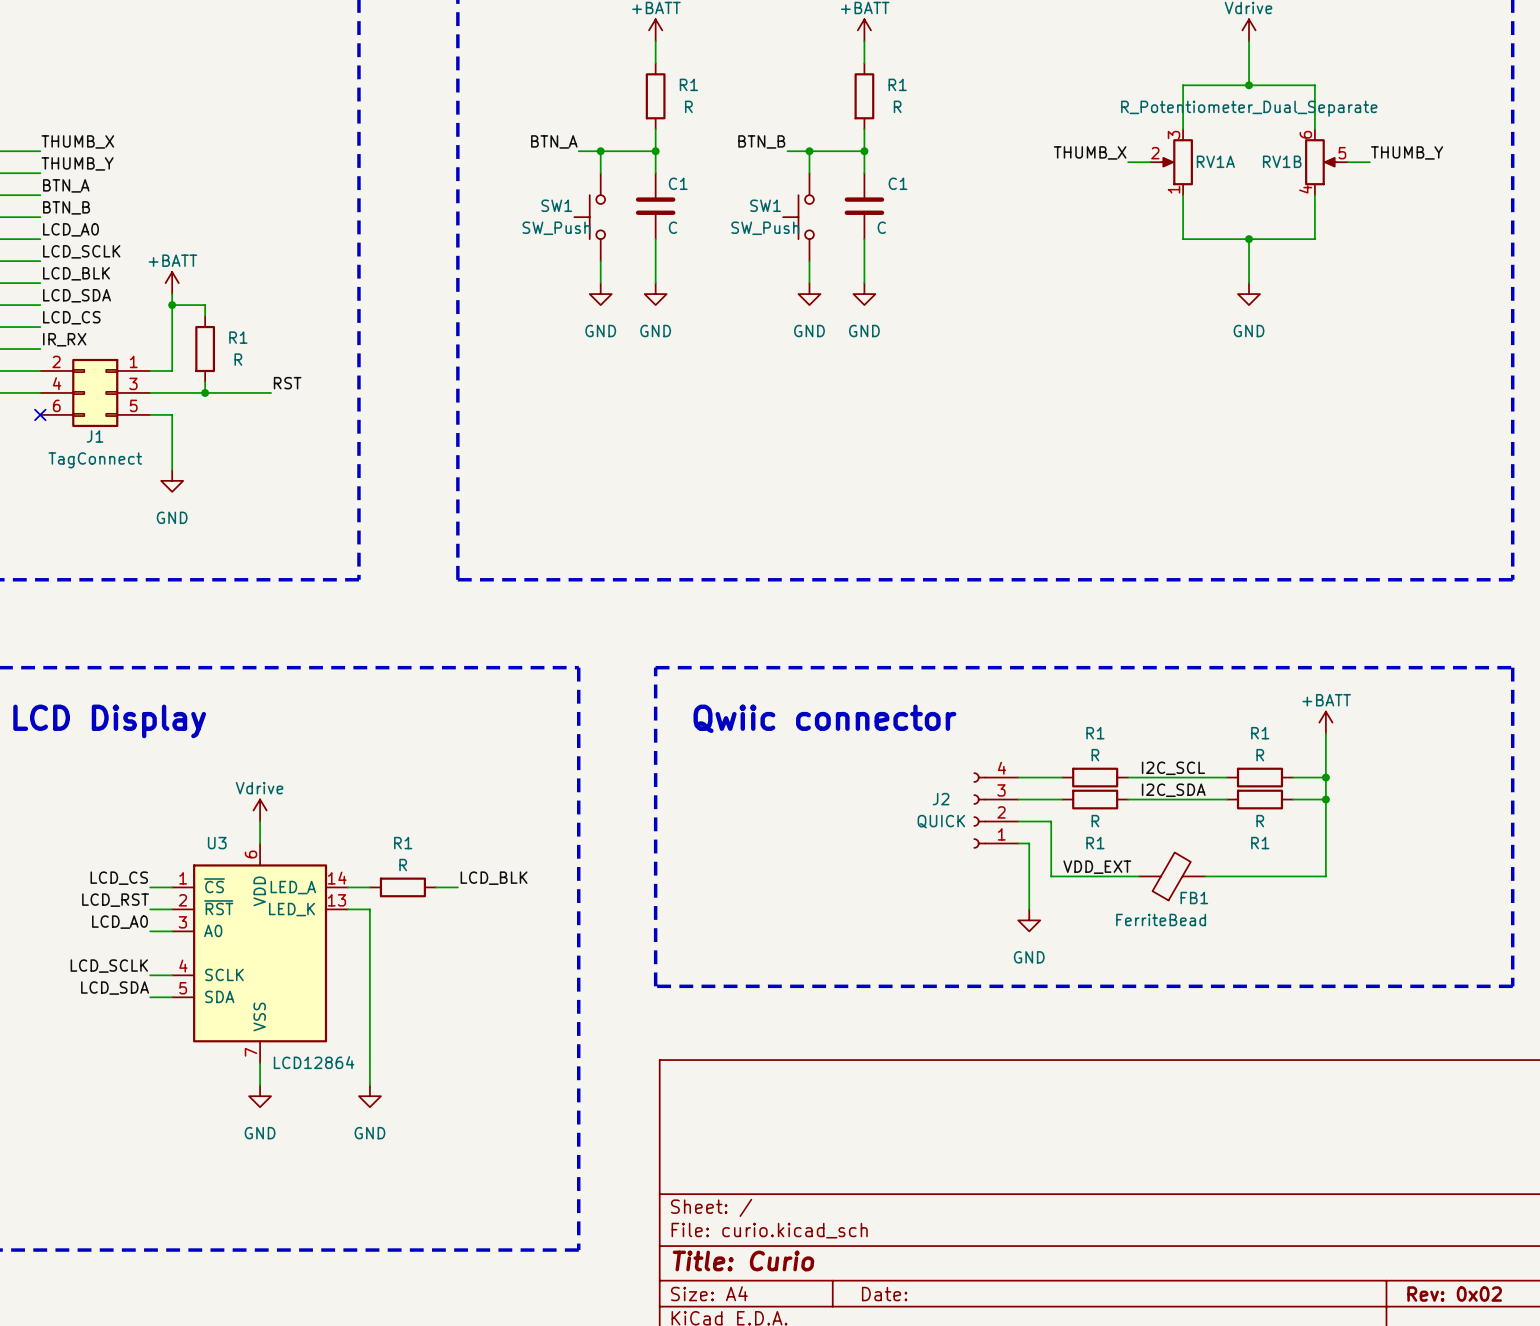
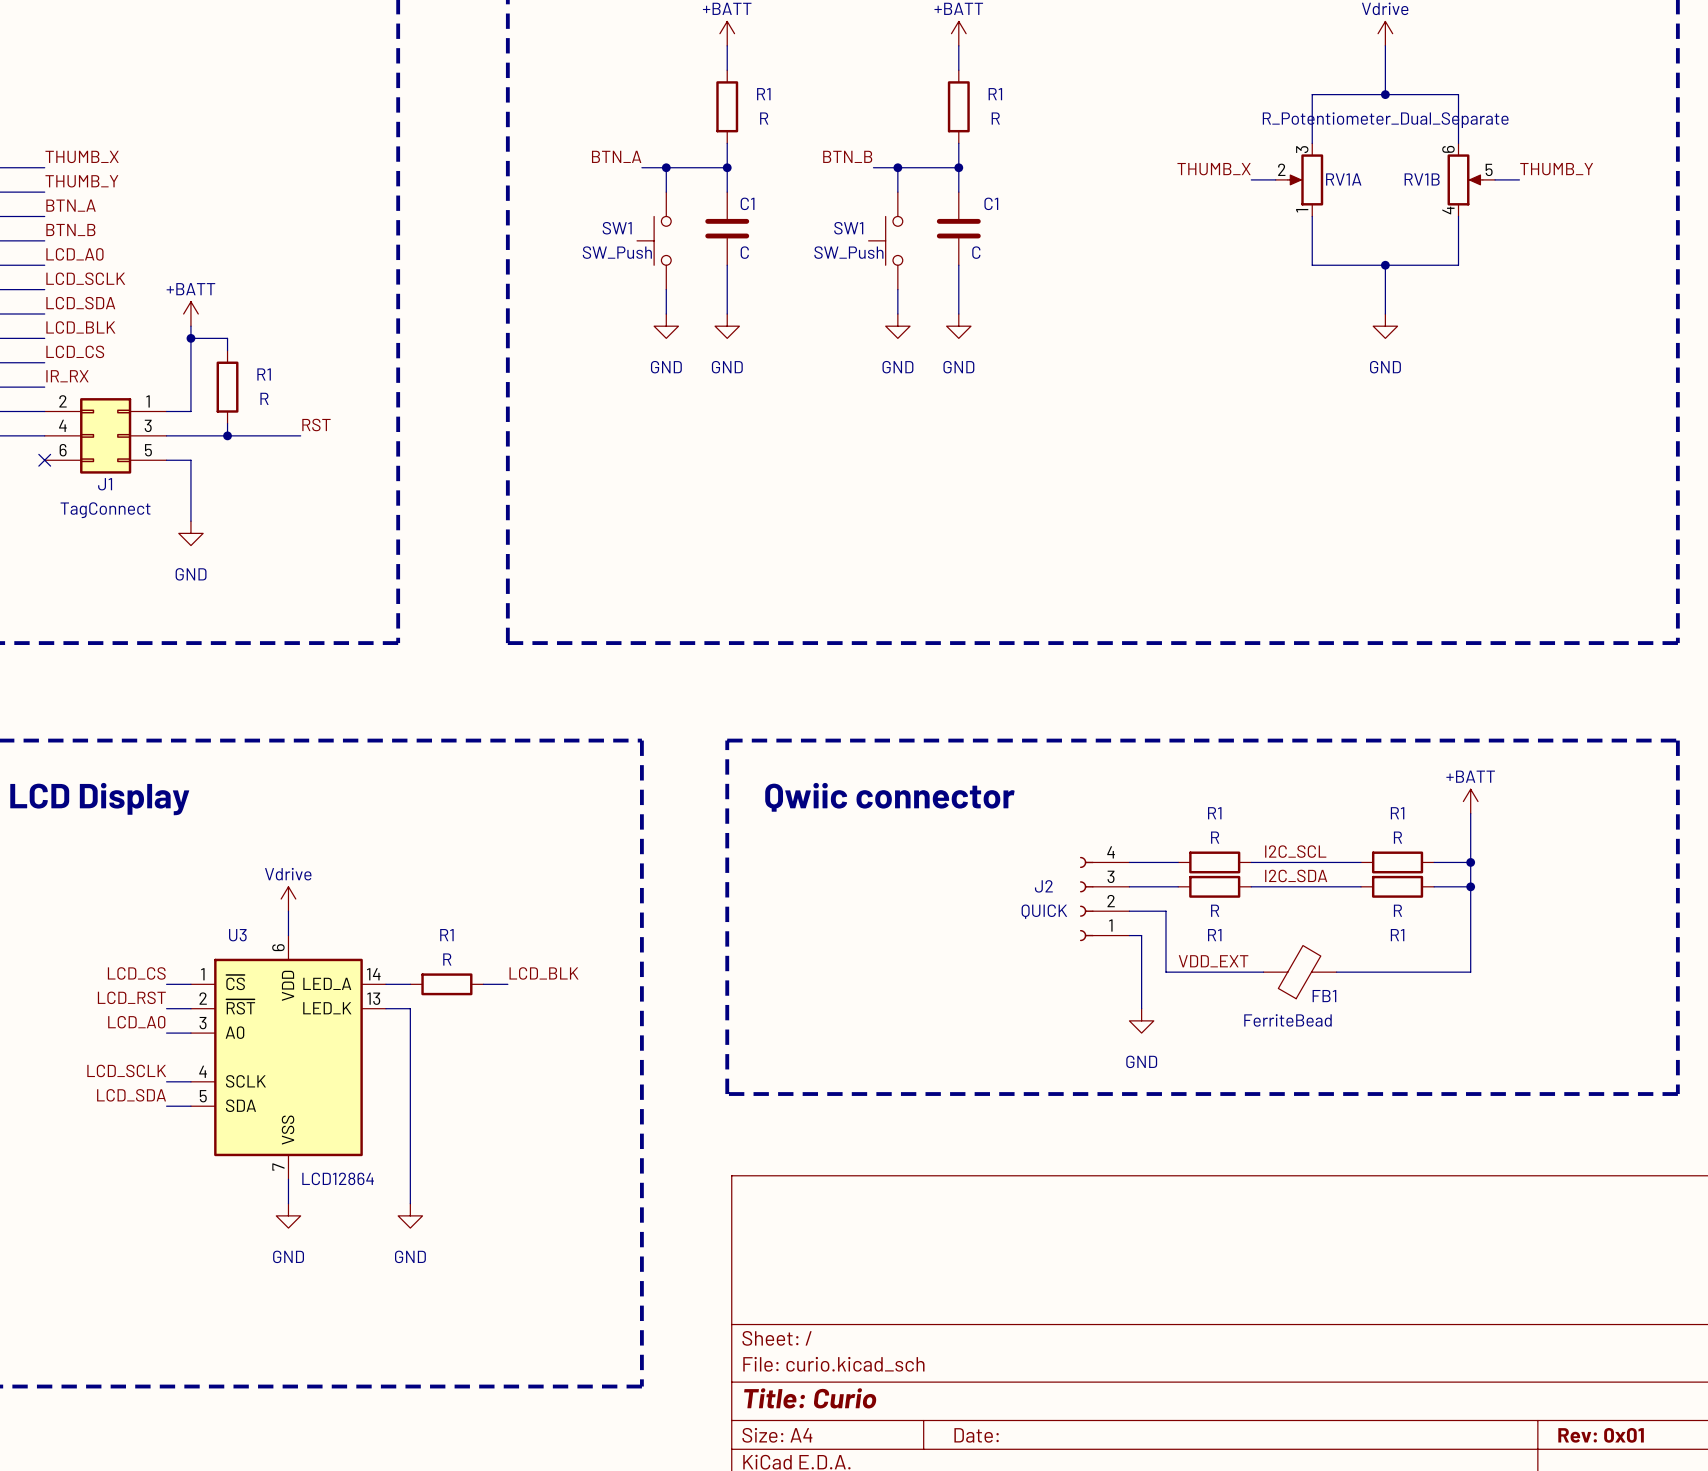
label: LCD_BLK (76, 273) -> LCD_SDA (80, 303)
label: LCD_SDA (77, 295) -> LCD_BLK (80, 327)
title block: Rev: 0x02 (1454, 1294) -> Rev: 0x01 (1601, 1435)

